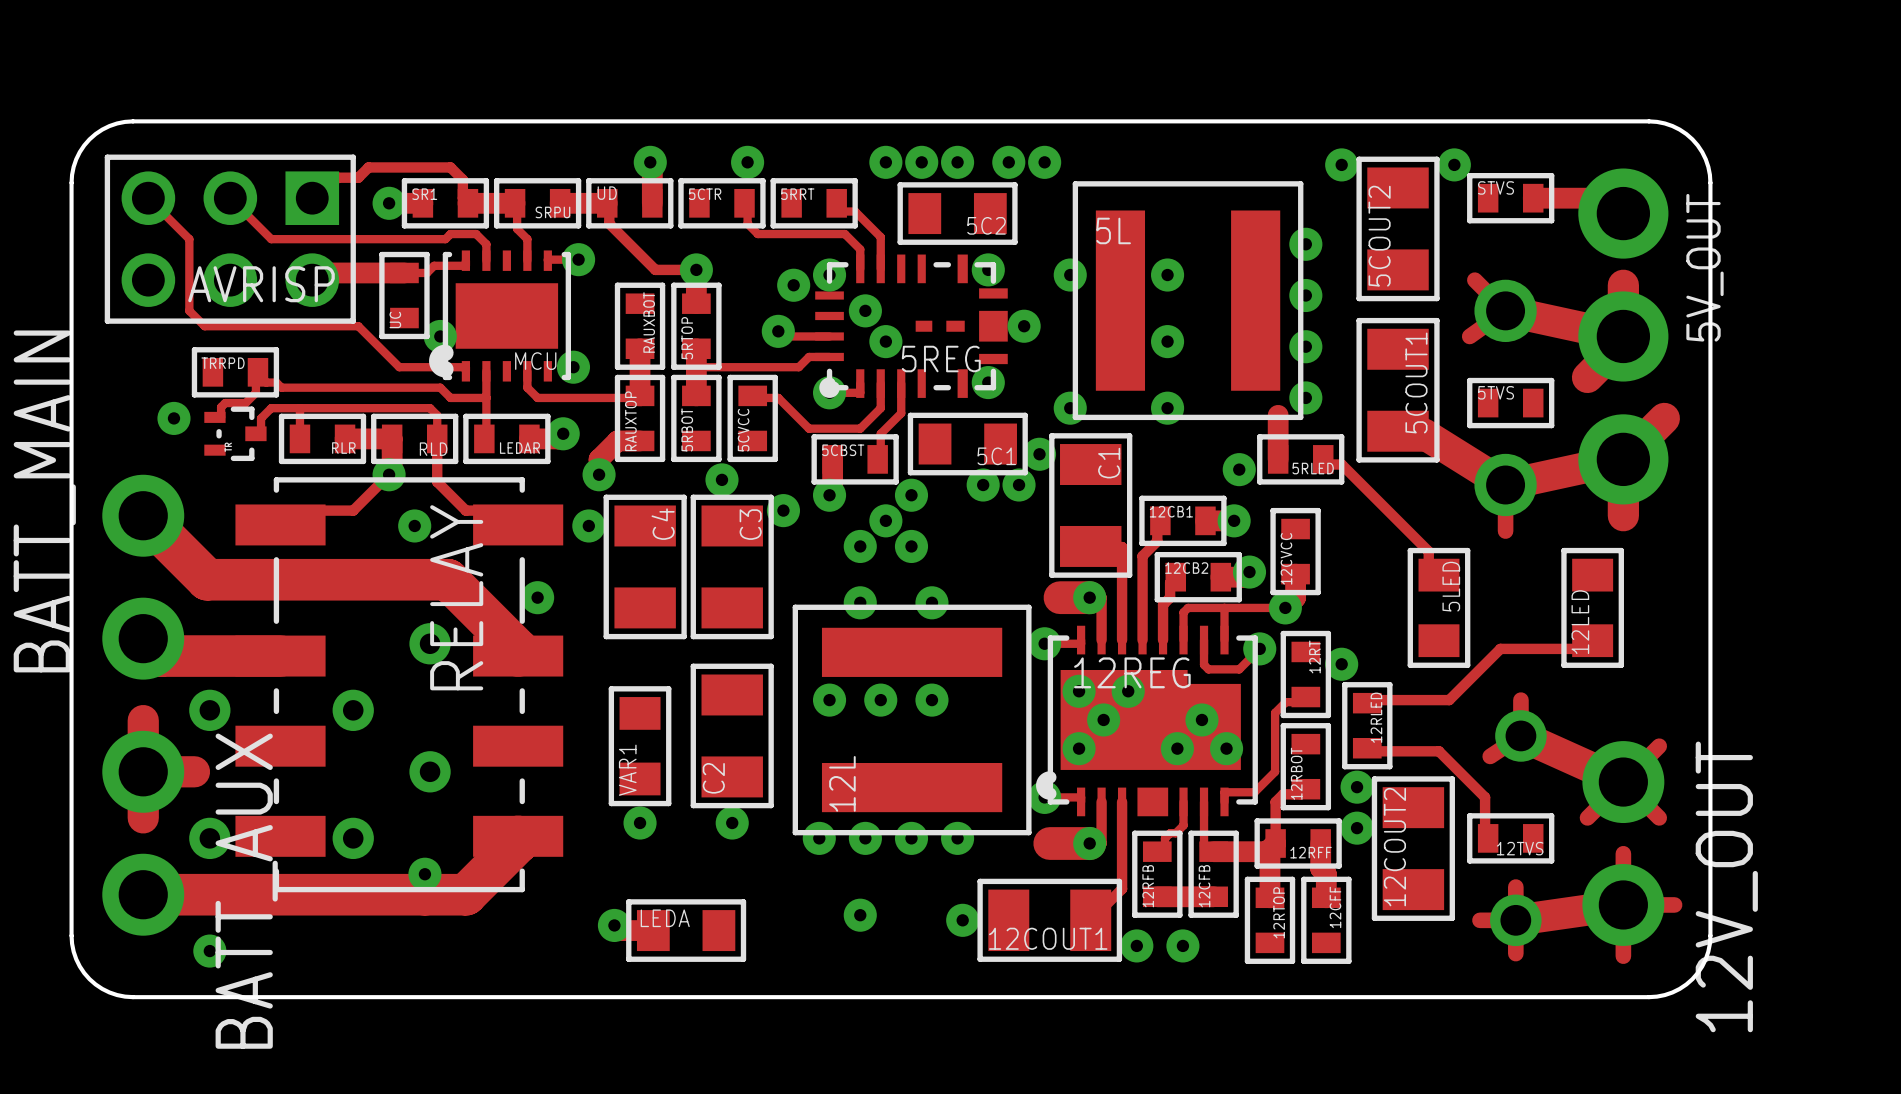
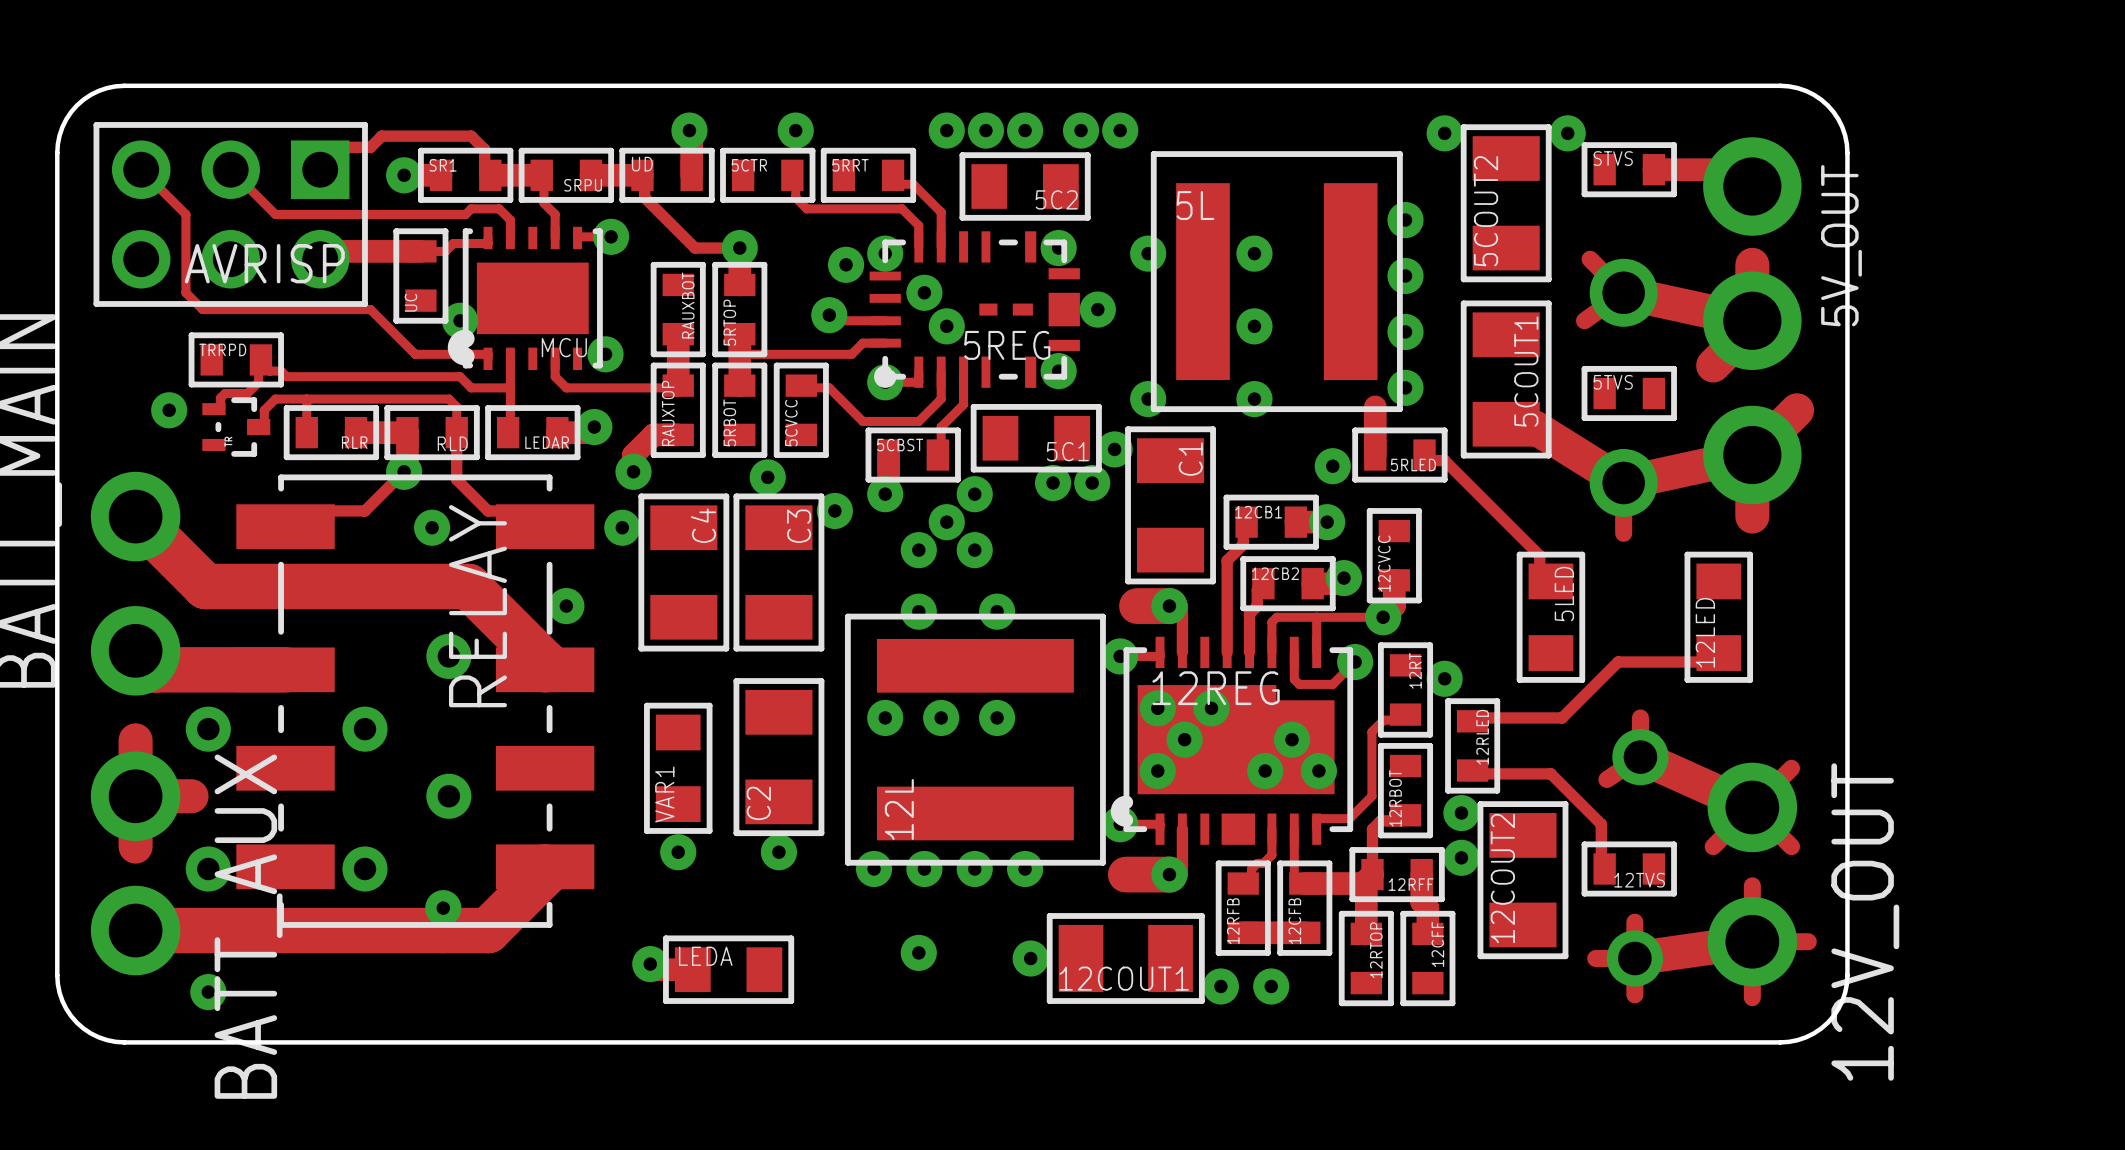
track: (1090, 546) (1122, 547) (1122, 640) -> none
track: (1122, 801) (1122, 888) (1090, 920) -> none

